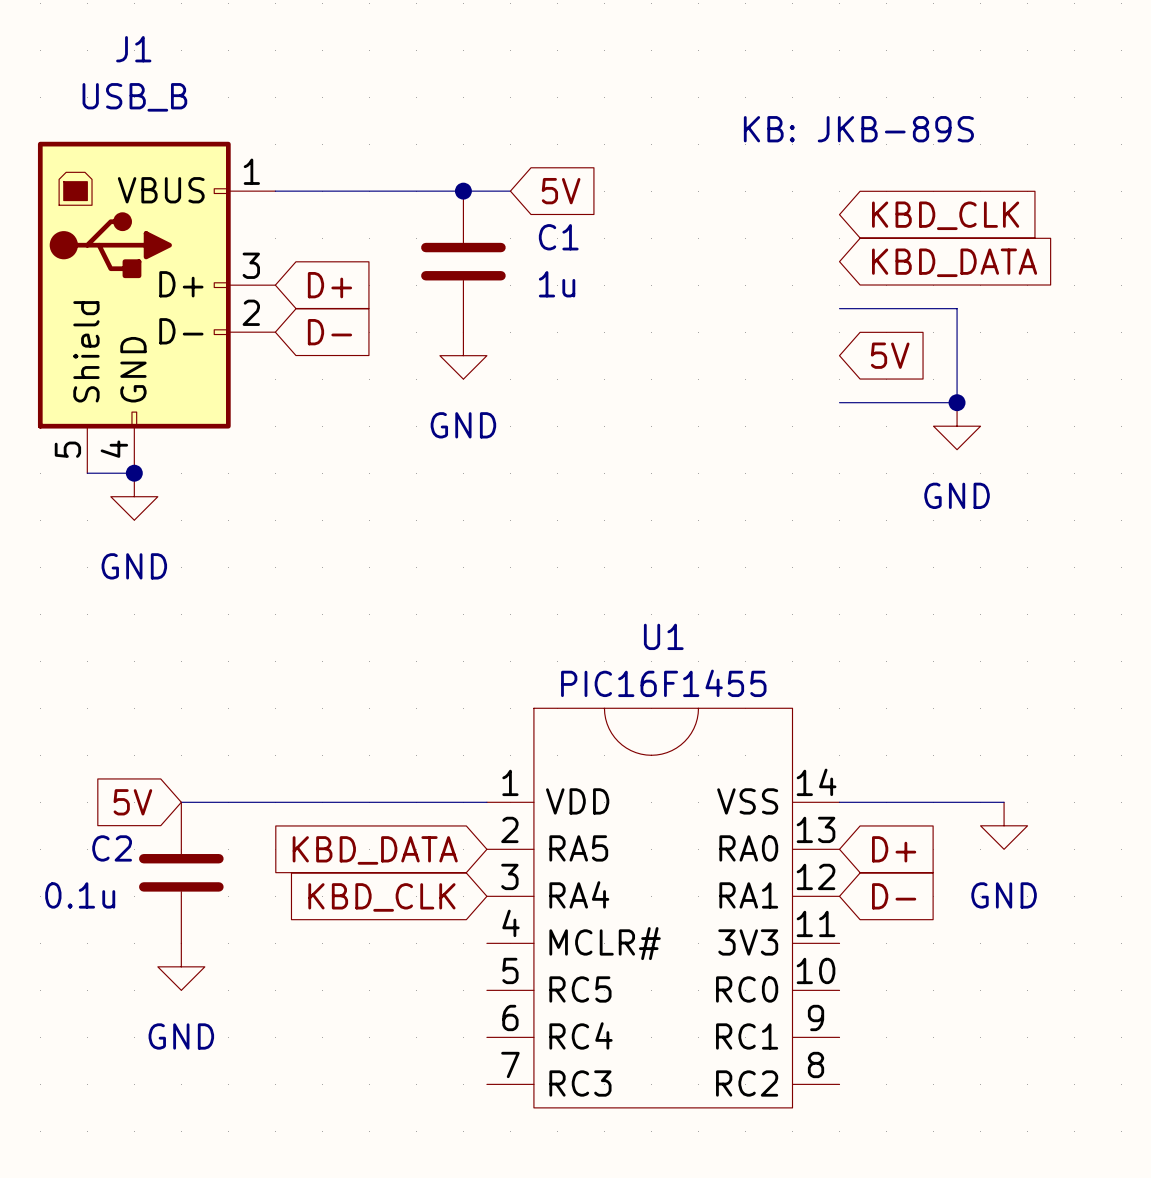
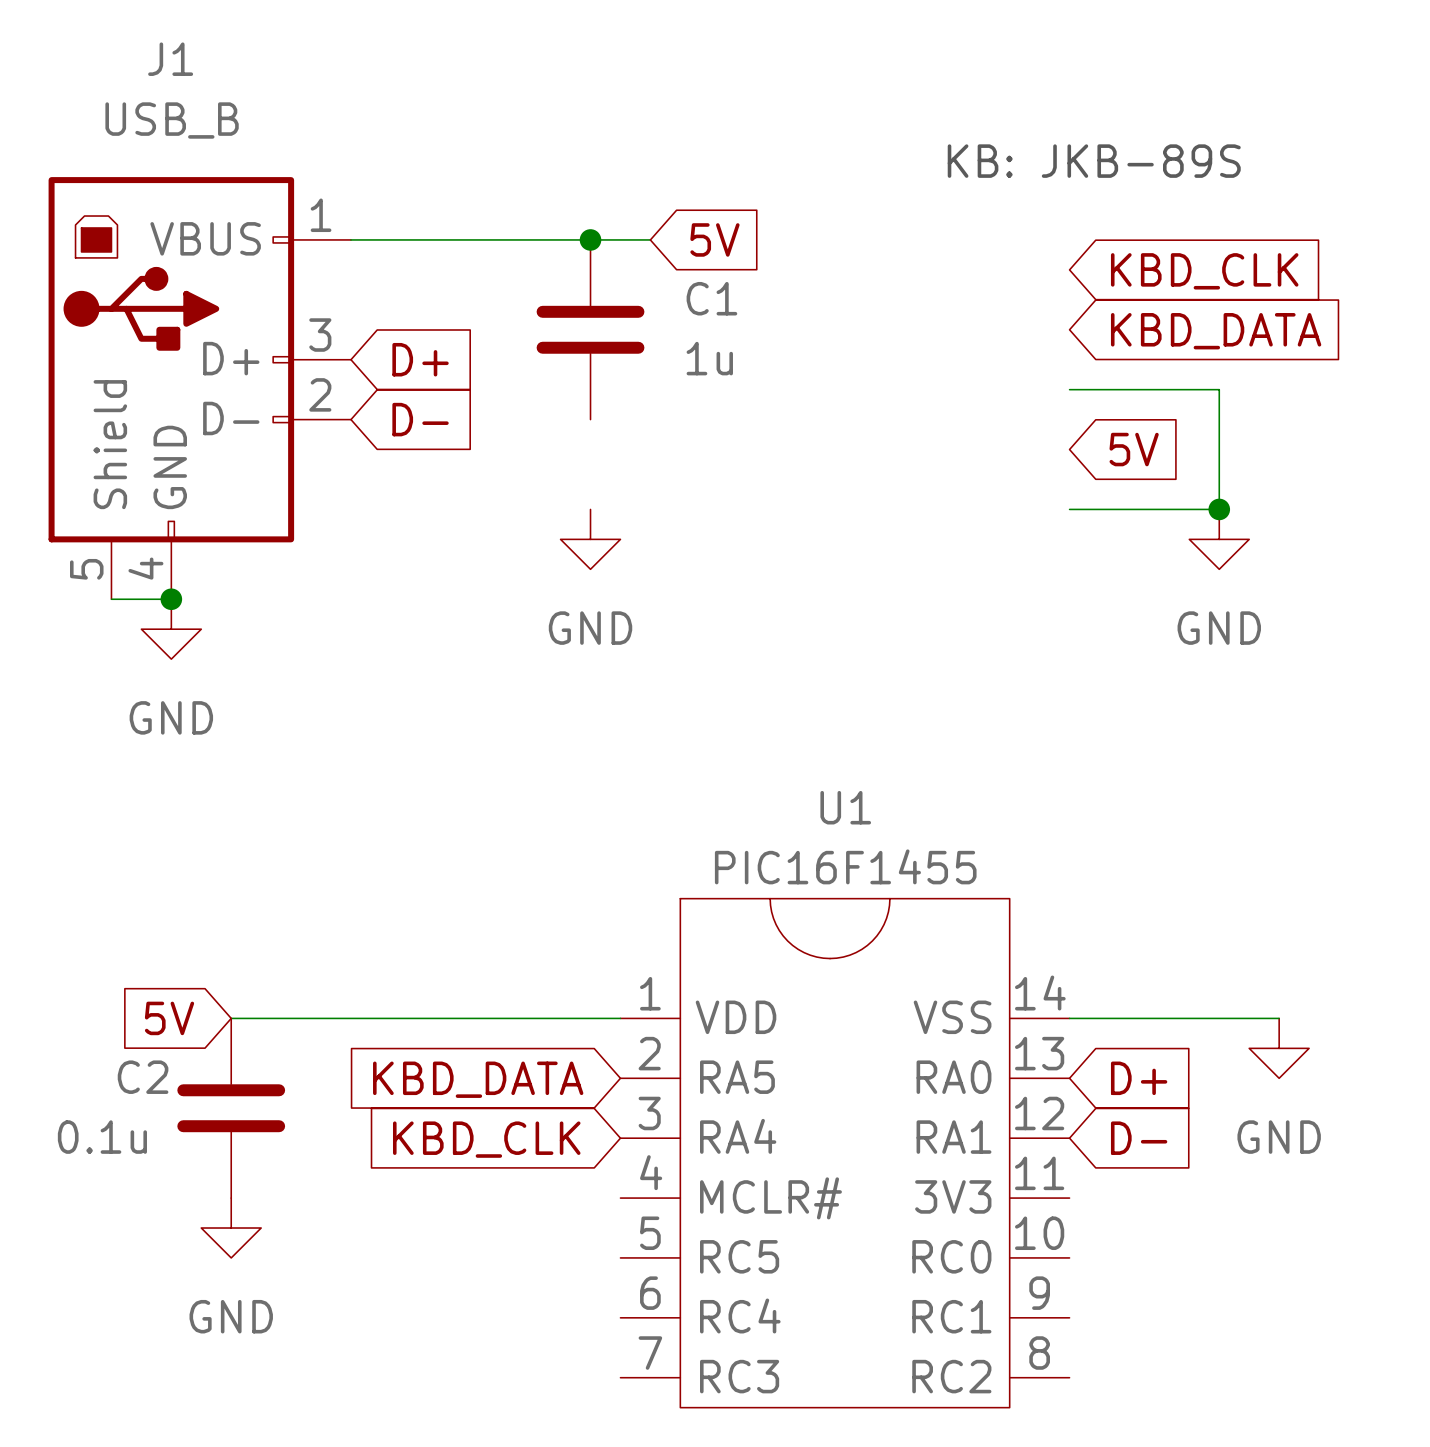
power symbol position: GND (463, 355) -> GND (590, 539)

